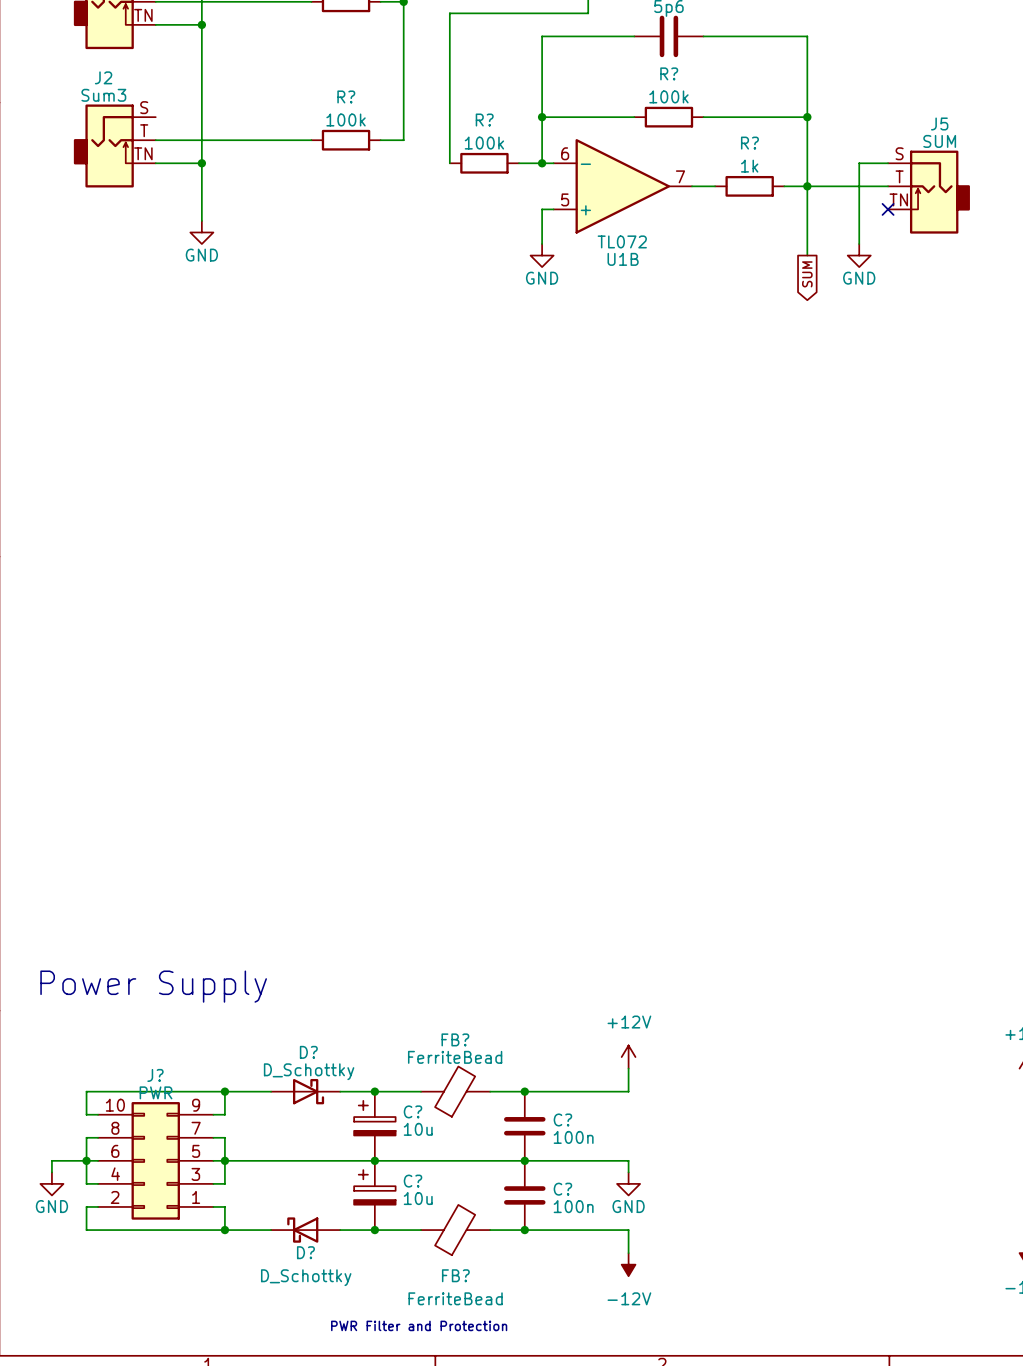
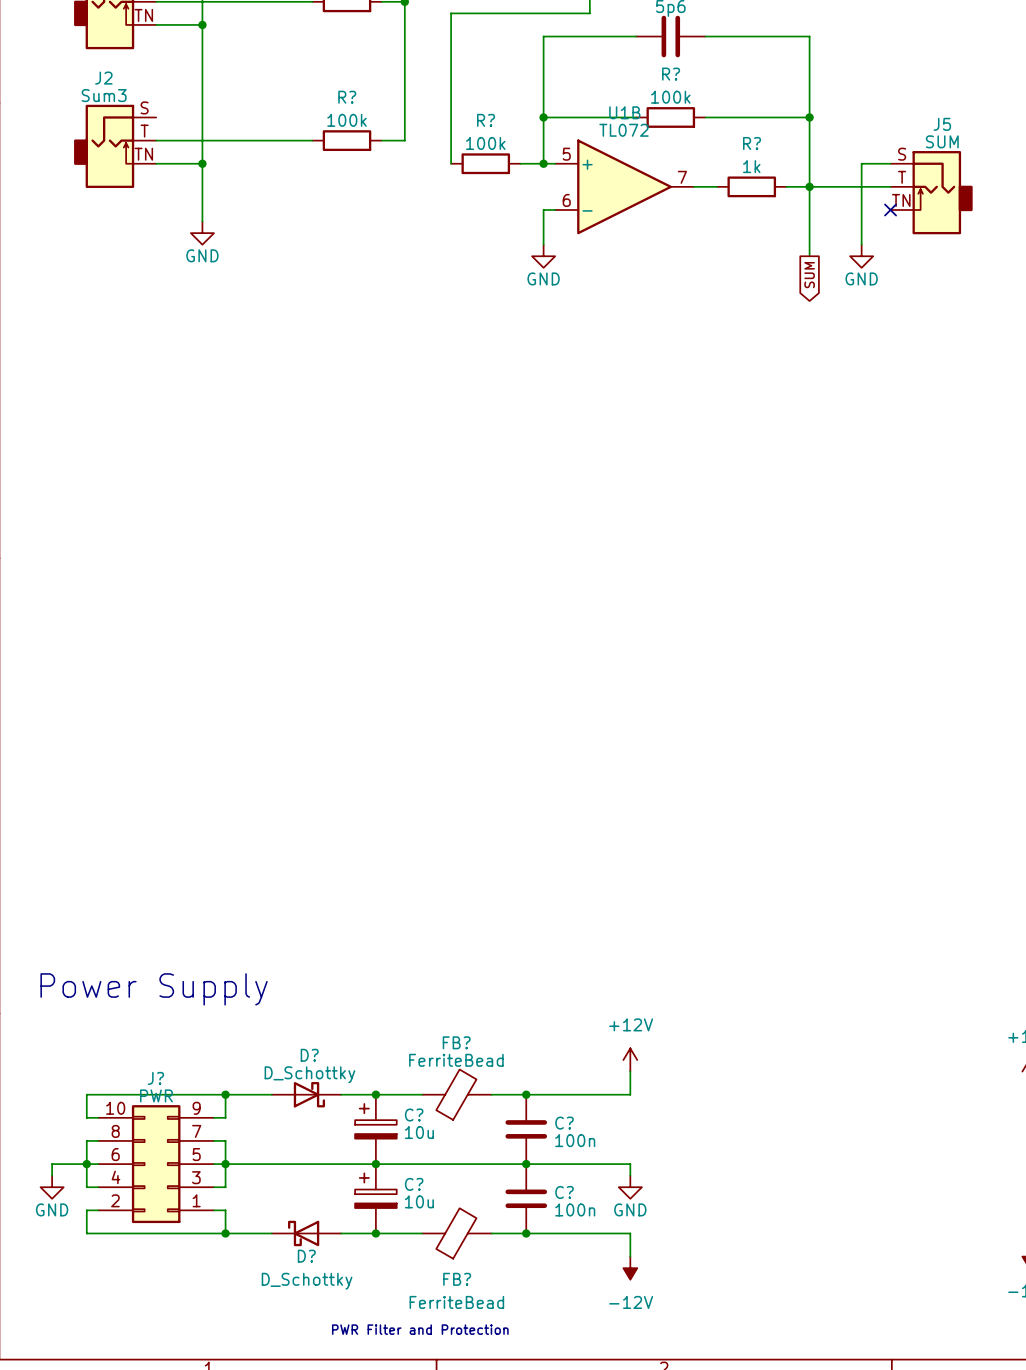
U1B flip: as is (622, 186) -> up-down (624, 186)

